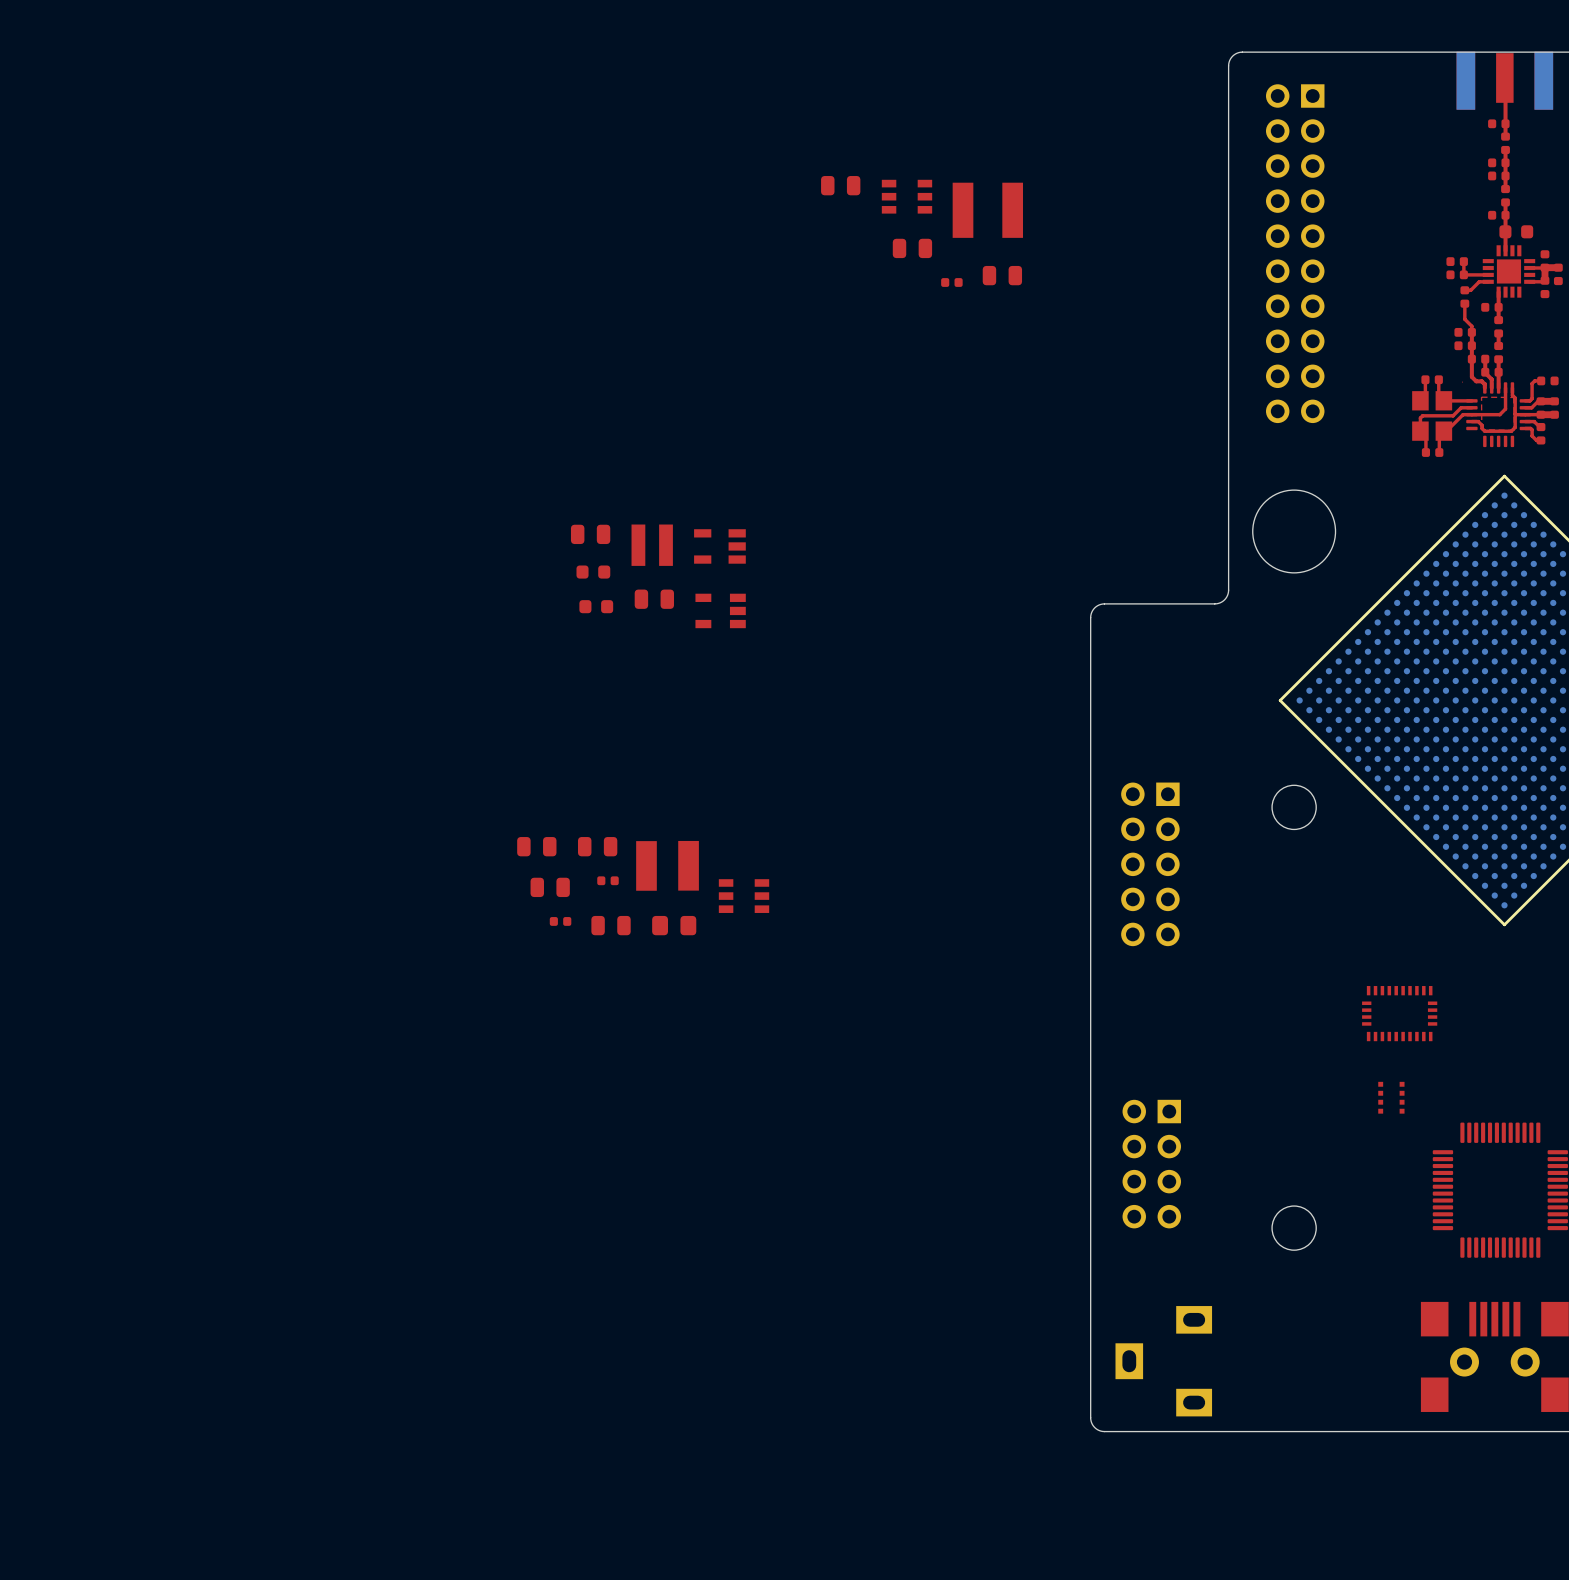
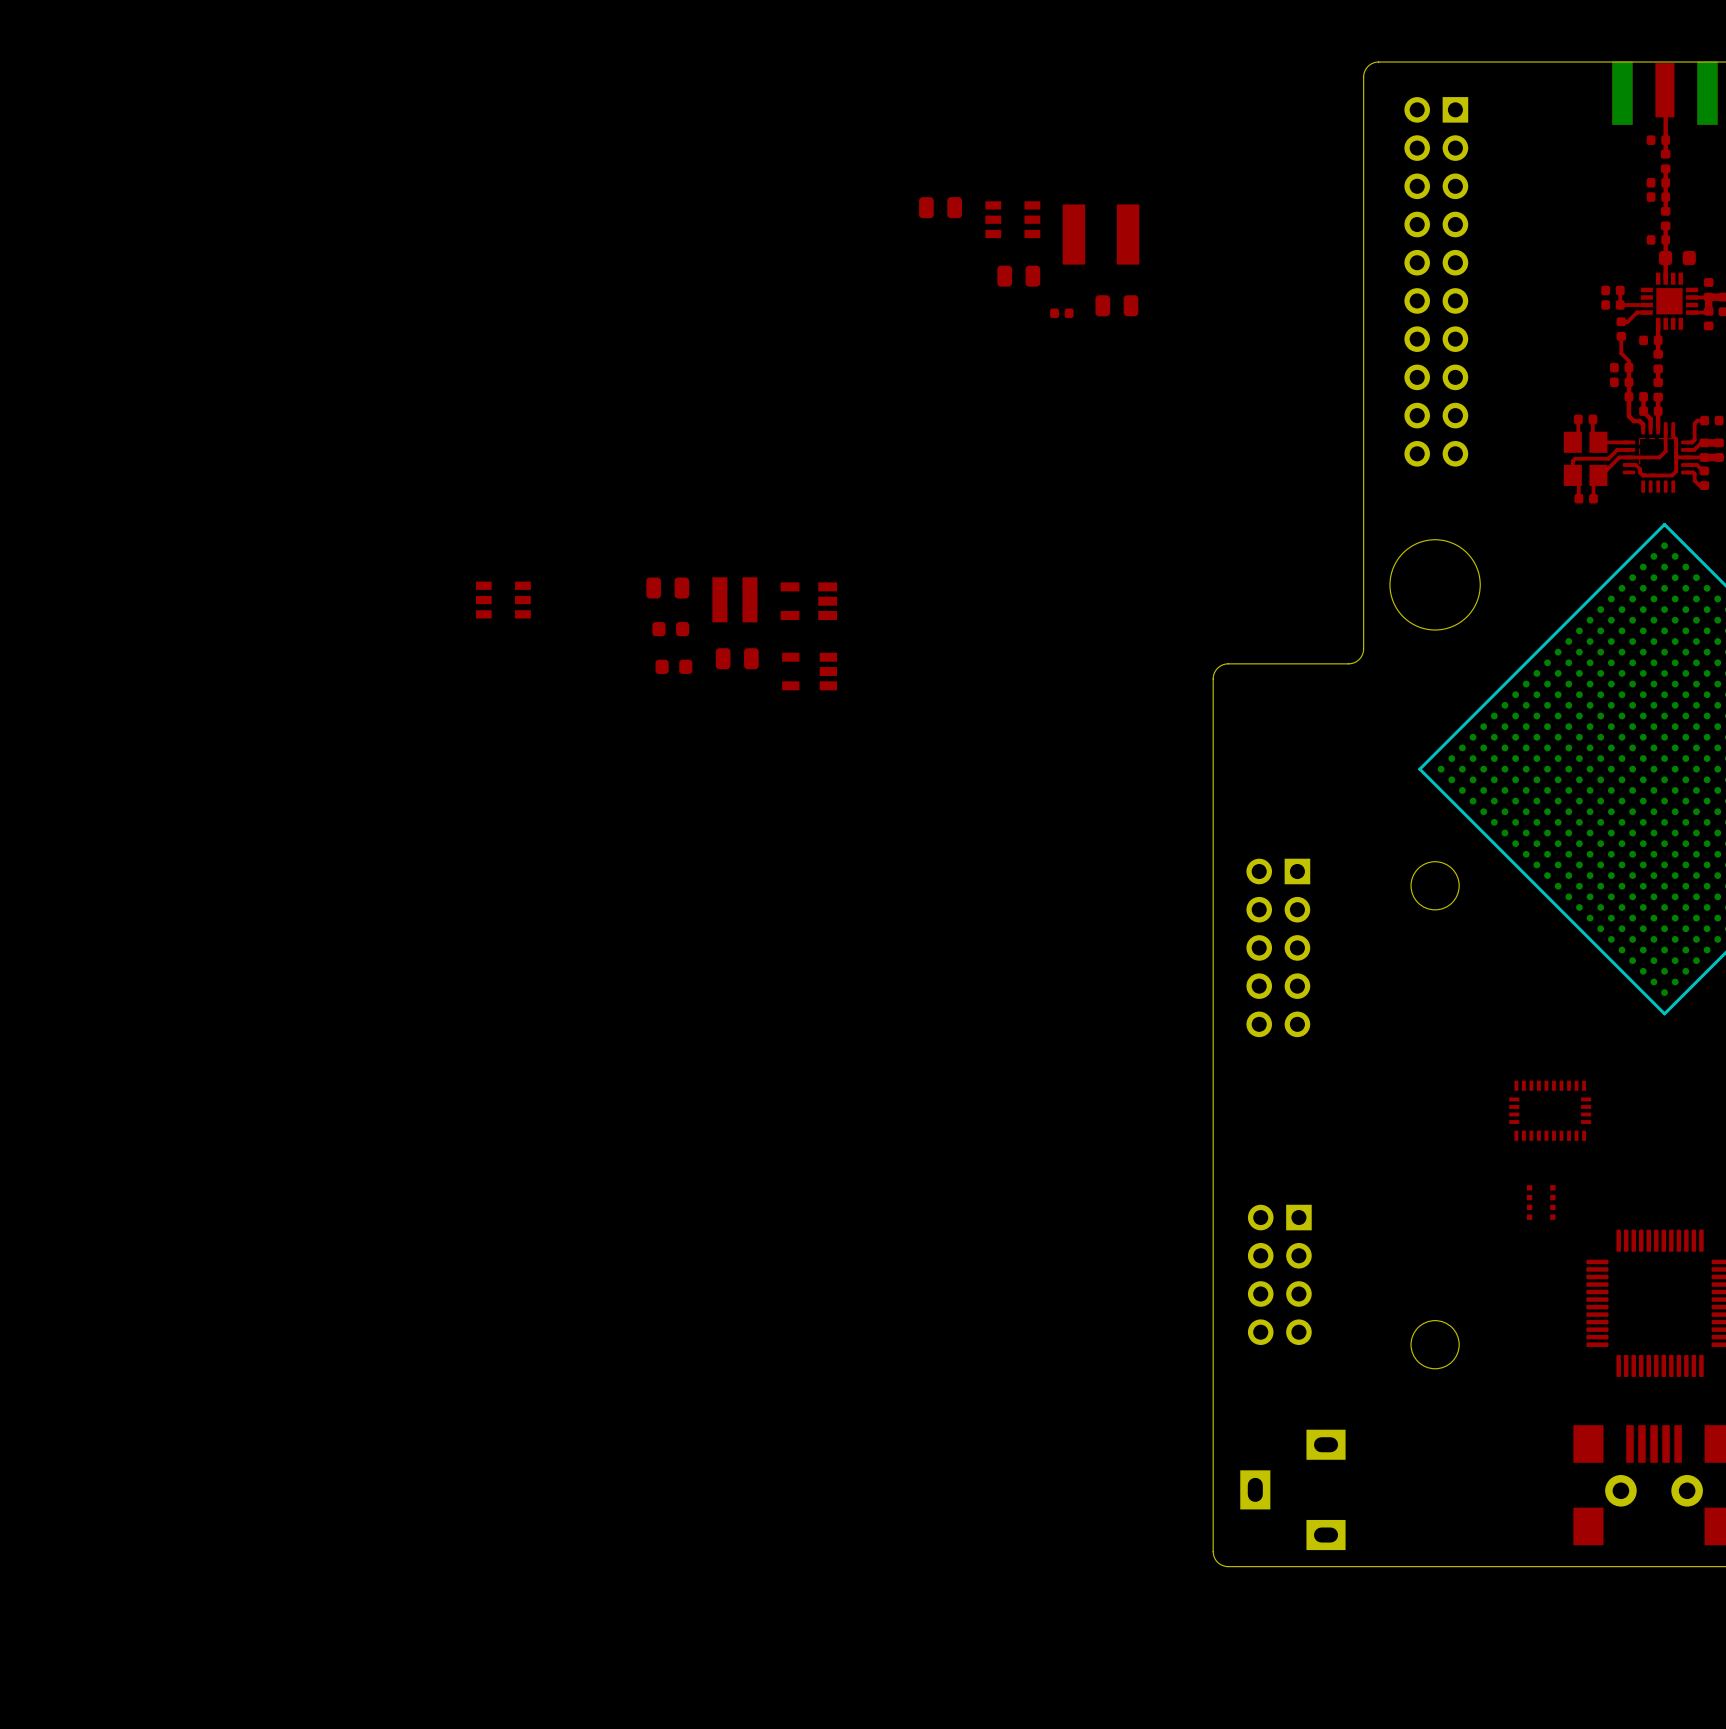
part: none -> (503, 600)
part: (536, 846) -> none
part: (597, 846) -> none
part: (667, 865) -> none
part: (608, 880) -> none
part: (550, 887) -> none
part: (744, 896) -> none
part: (560, 921) -> none
part: (611, 925) -> none
part: (674, 925) -> none

